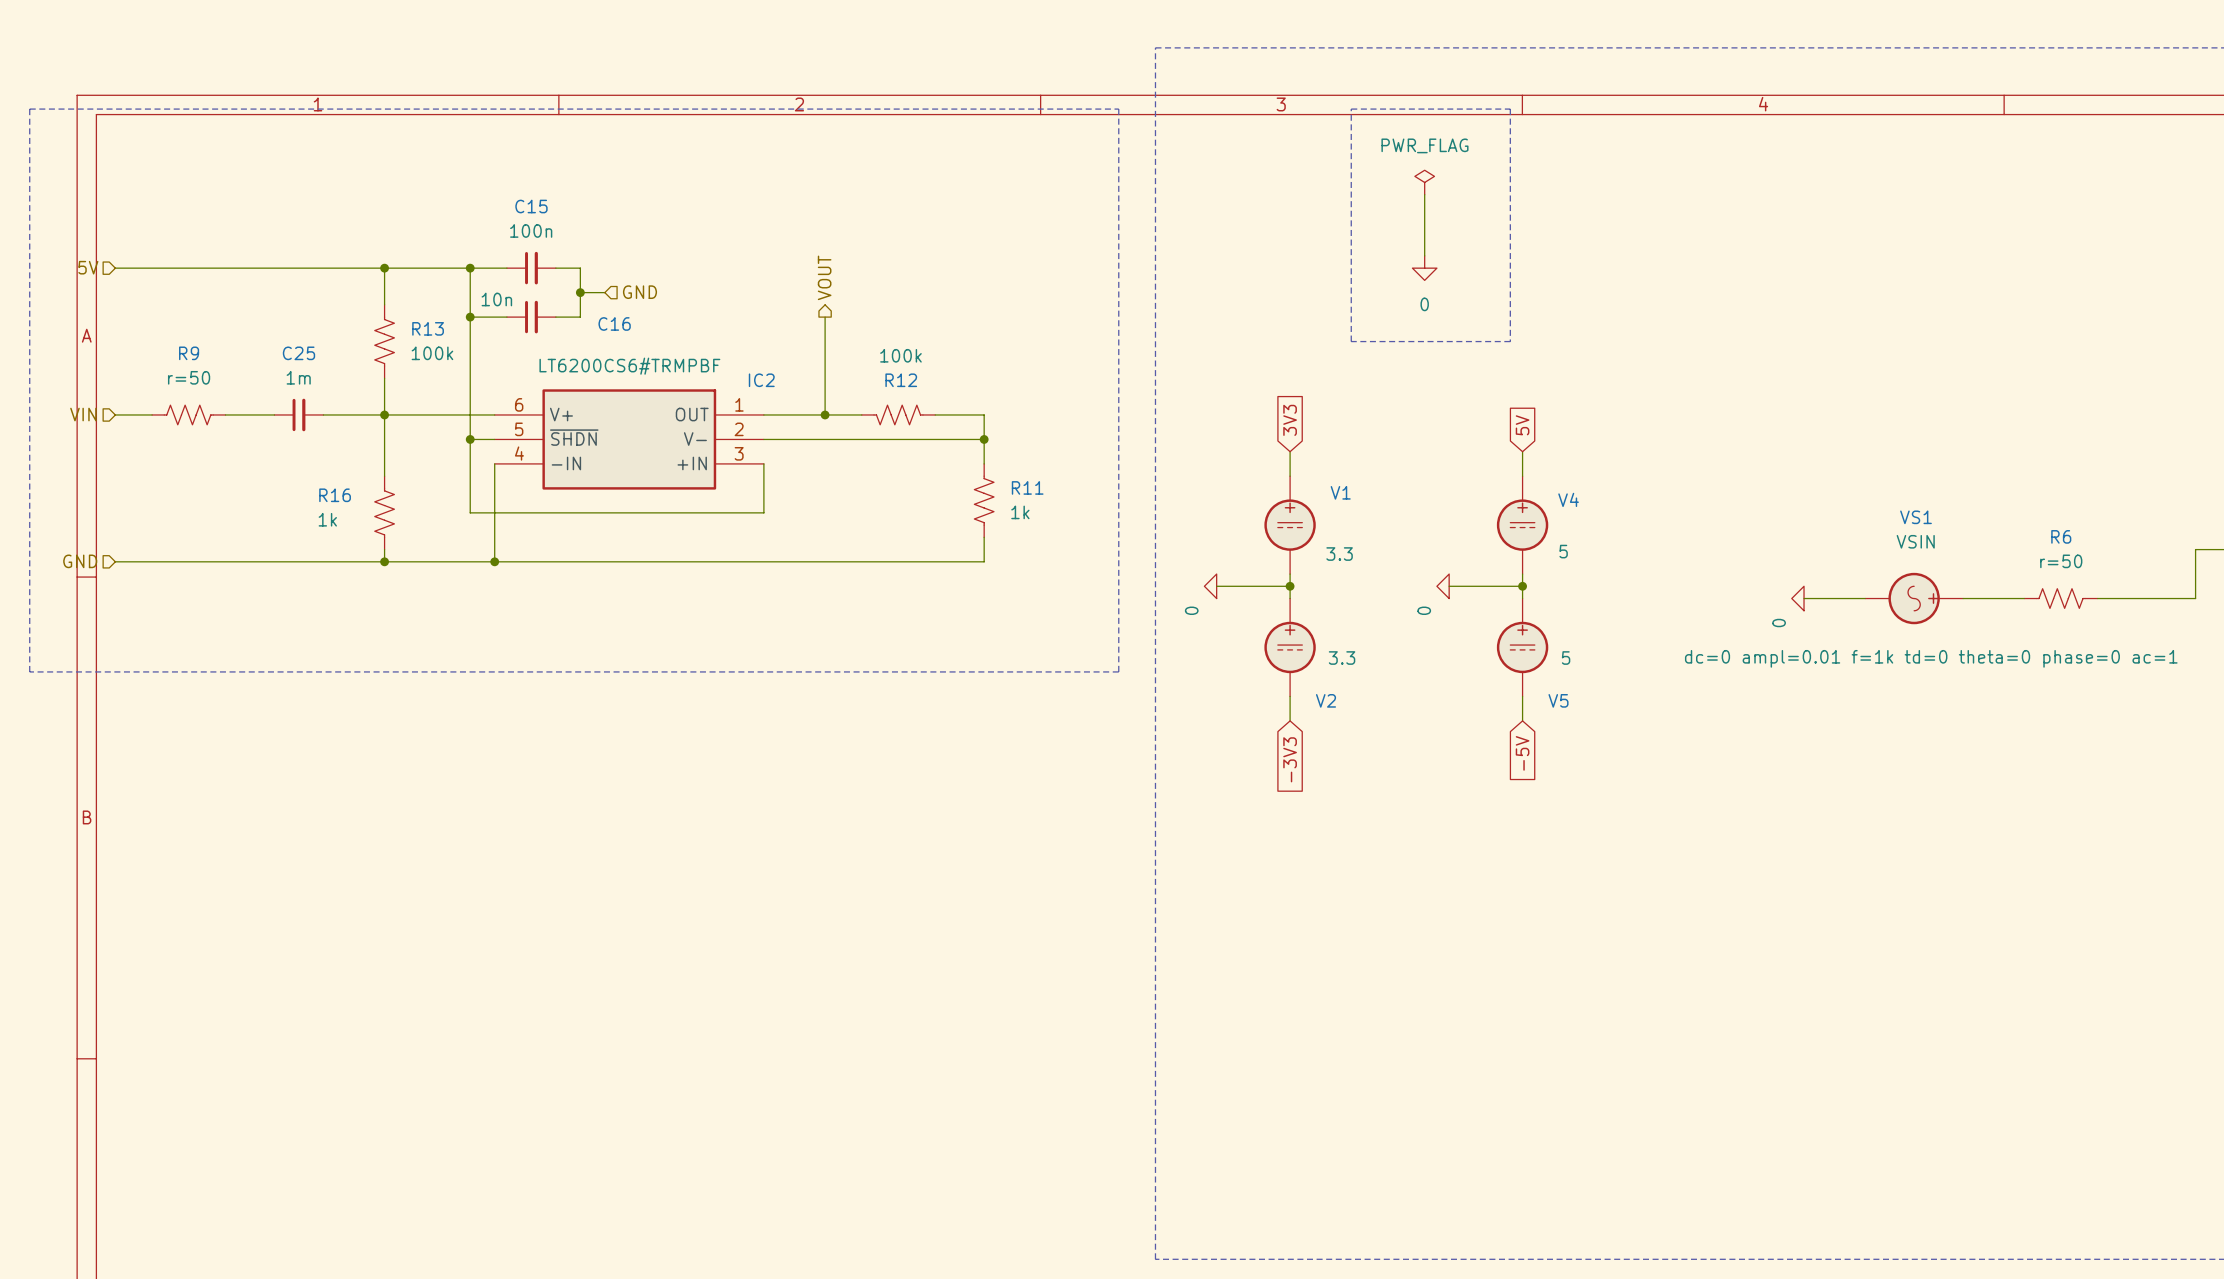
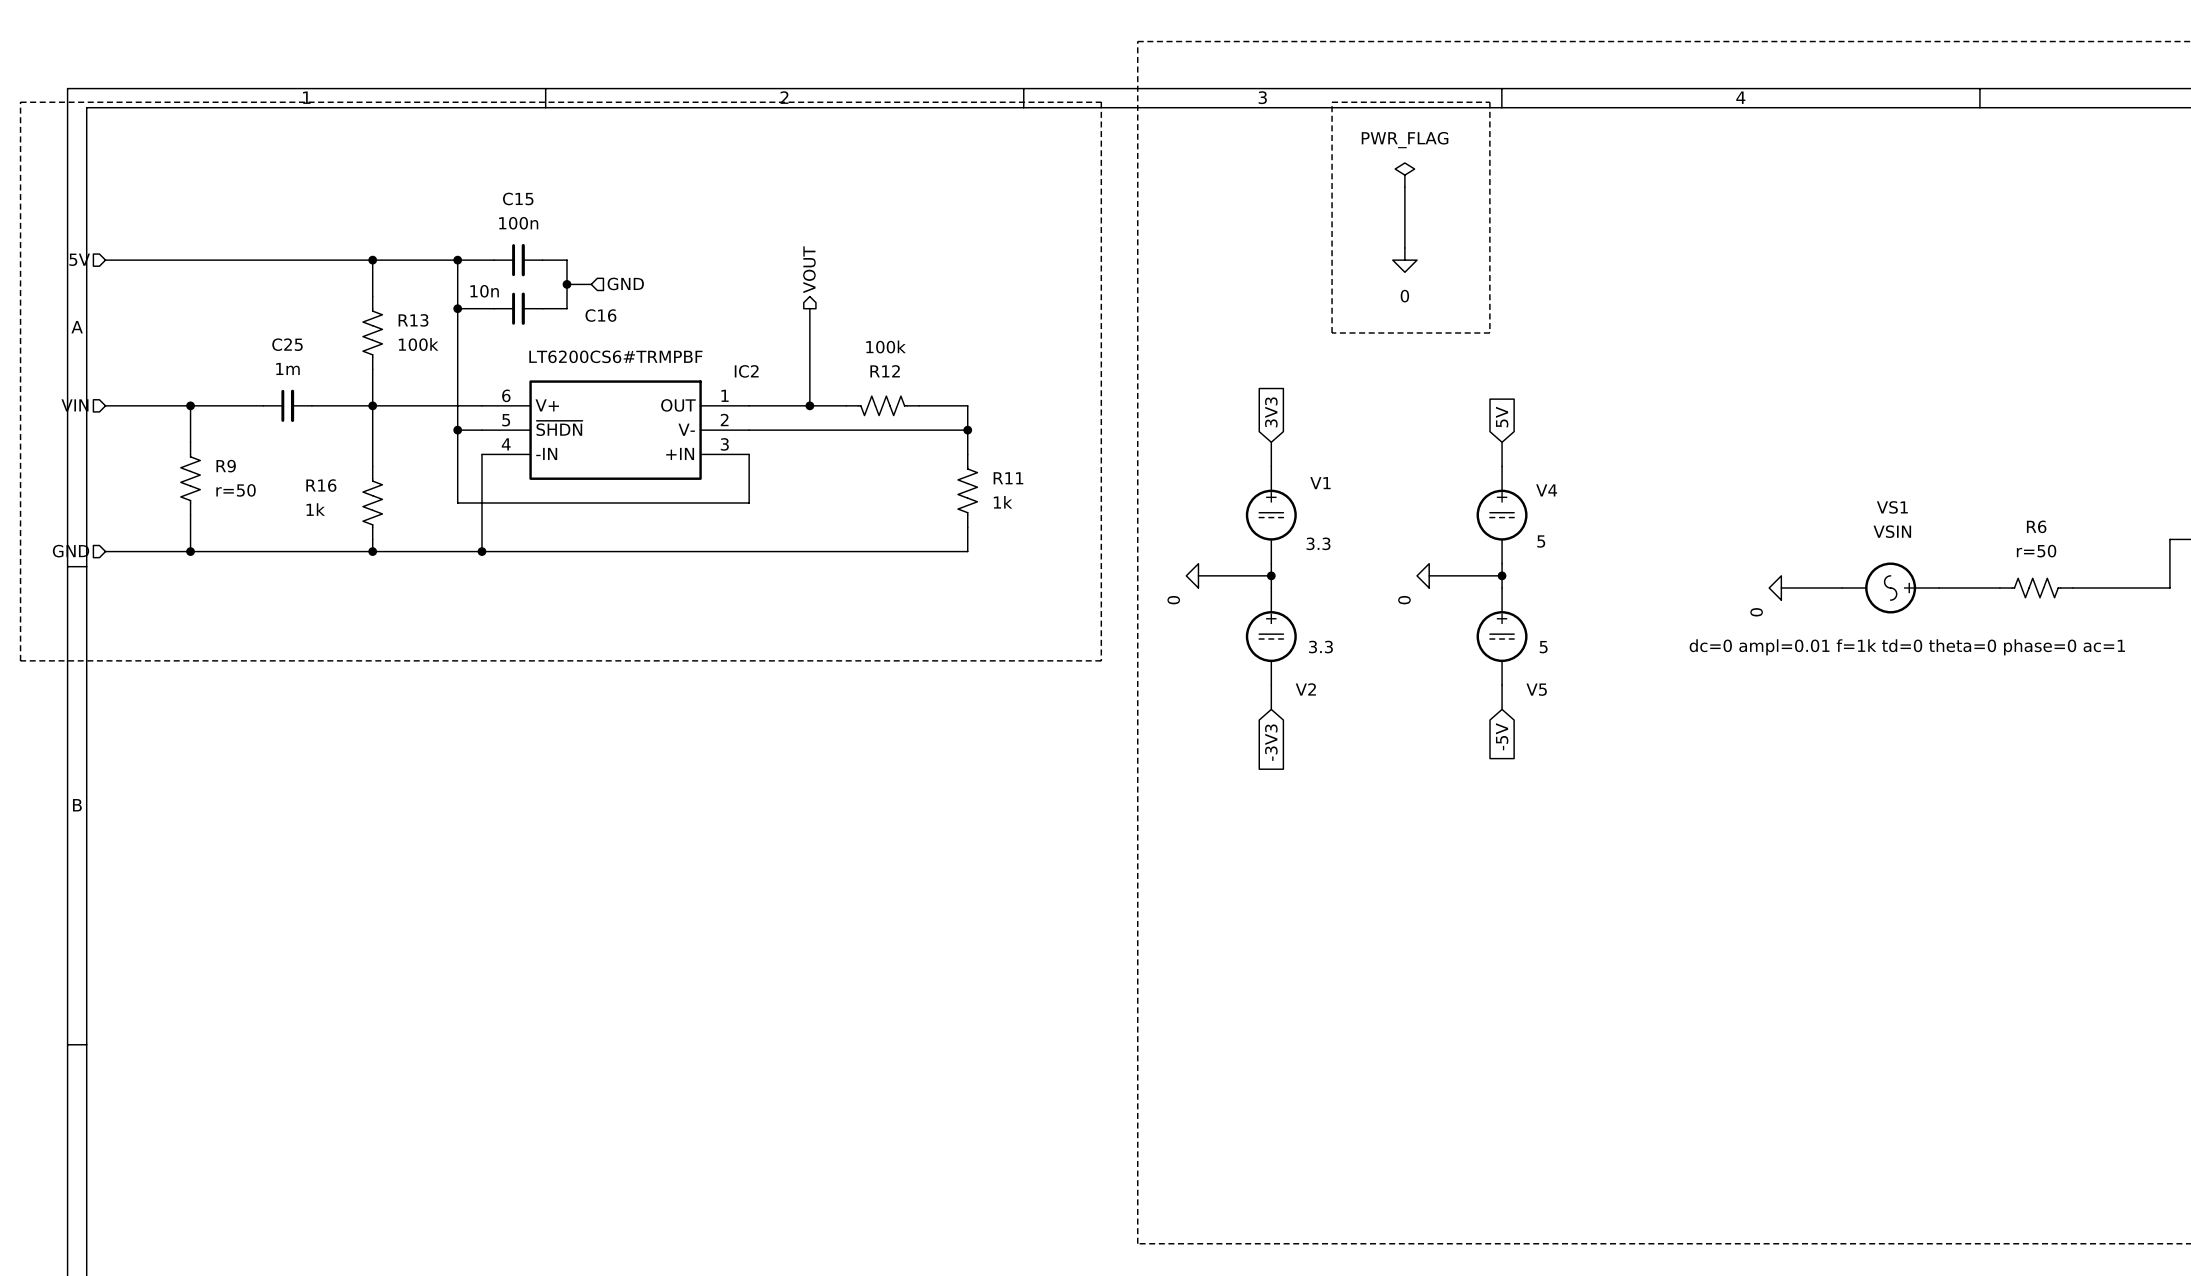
R9 name position: R9 (189, 353) -> R9 (226, 466)
R9 value position: r=50 (189, 377) -> r=50 (236, 490)
R9 rotation: 0° (188, 414) -> 90° clockwise (190, 478)
R9 position: (188, 414) -> (190, 478)
wire: none -> (190, 405) (190, 442)
junction: none -> (190, 405)
wire: none -> (190, 515) (190, 551)
junction: none -> (190, 551)

